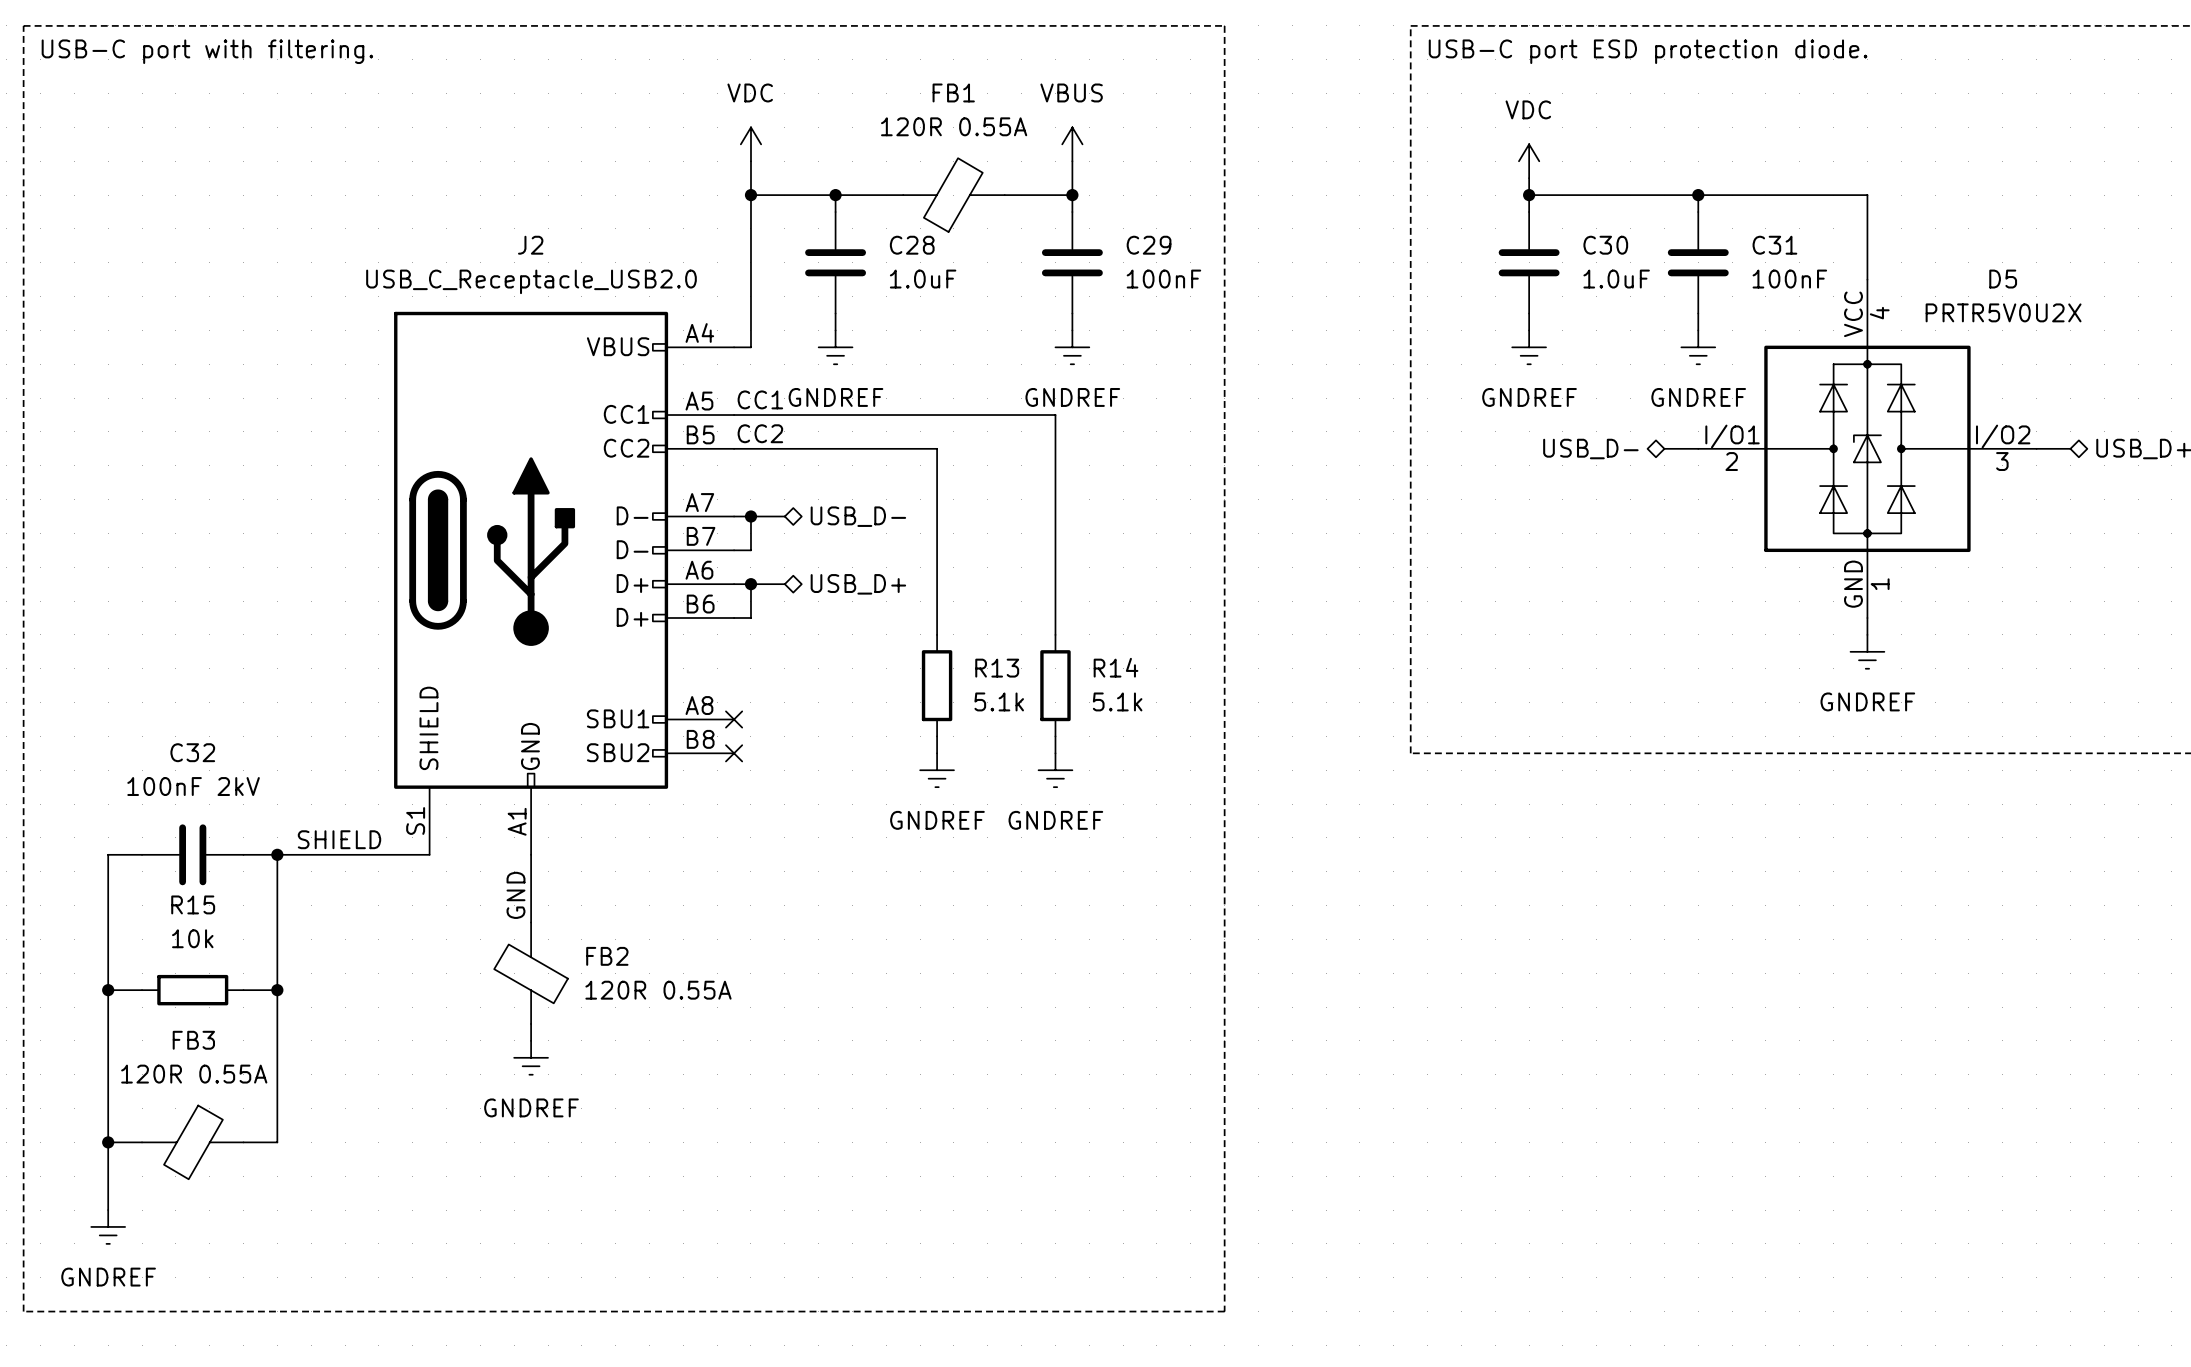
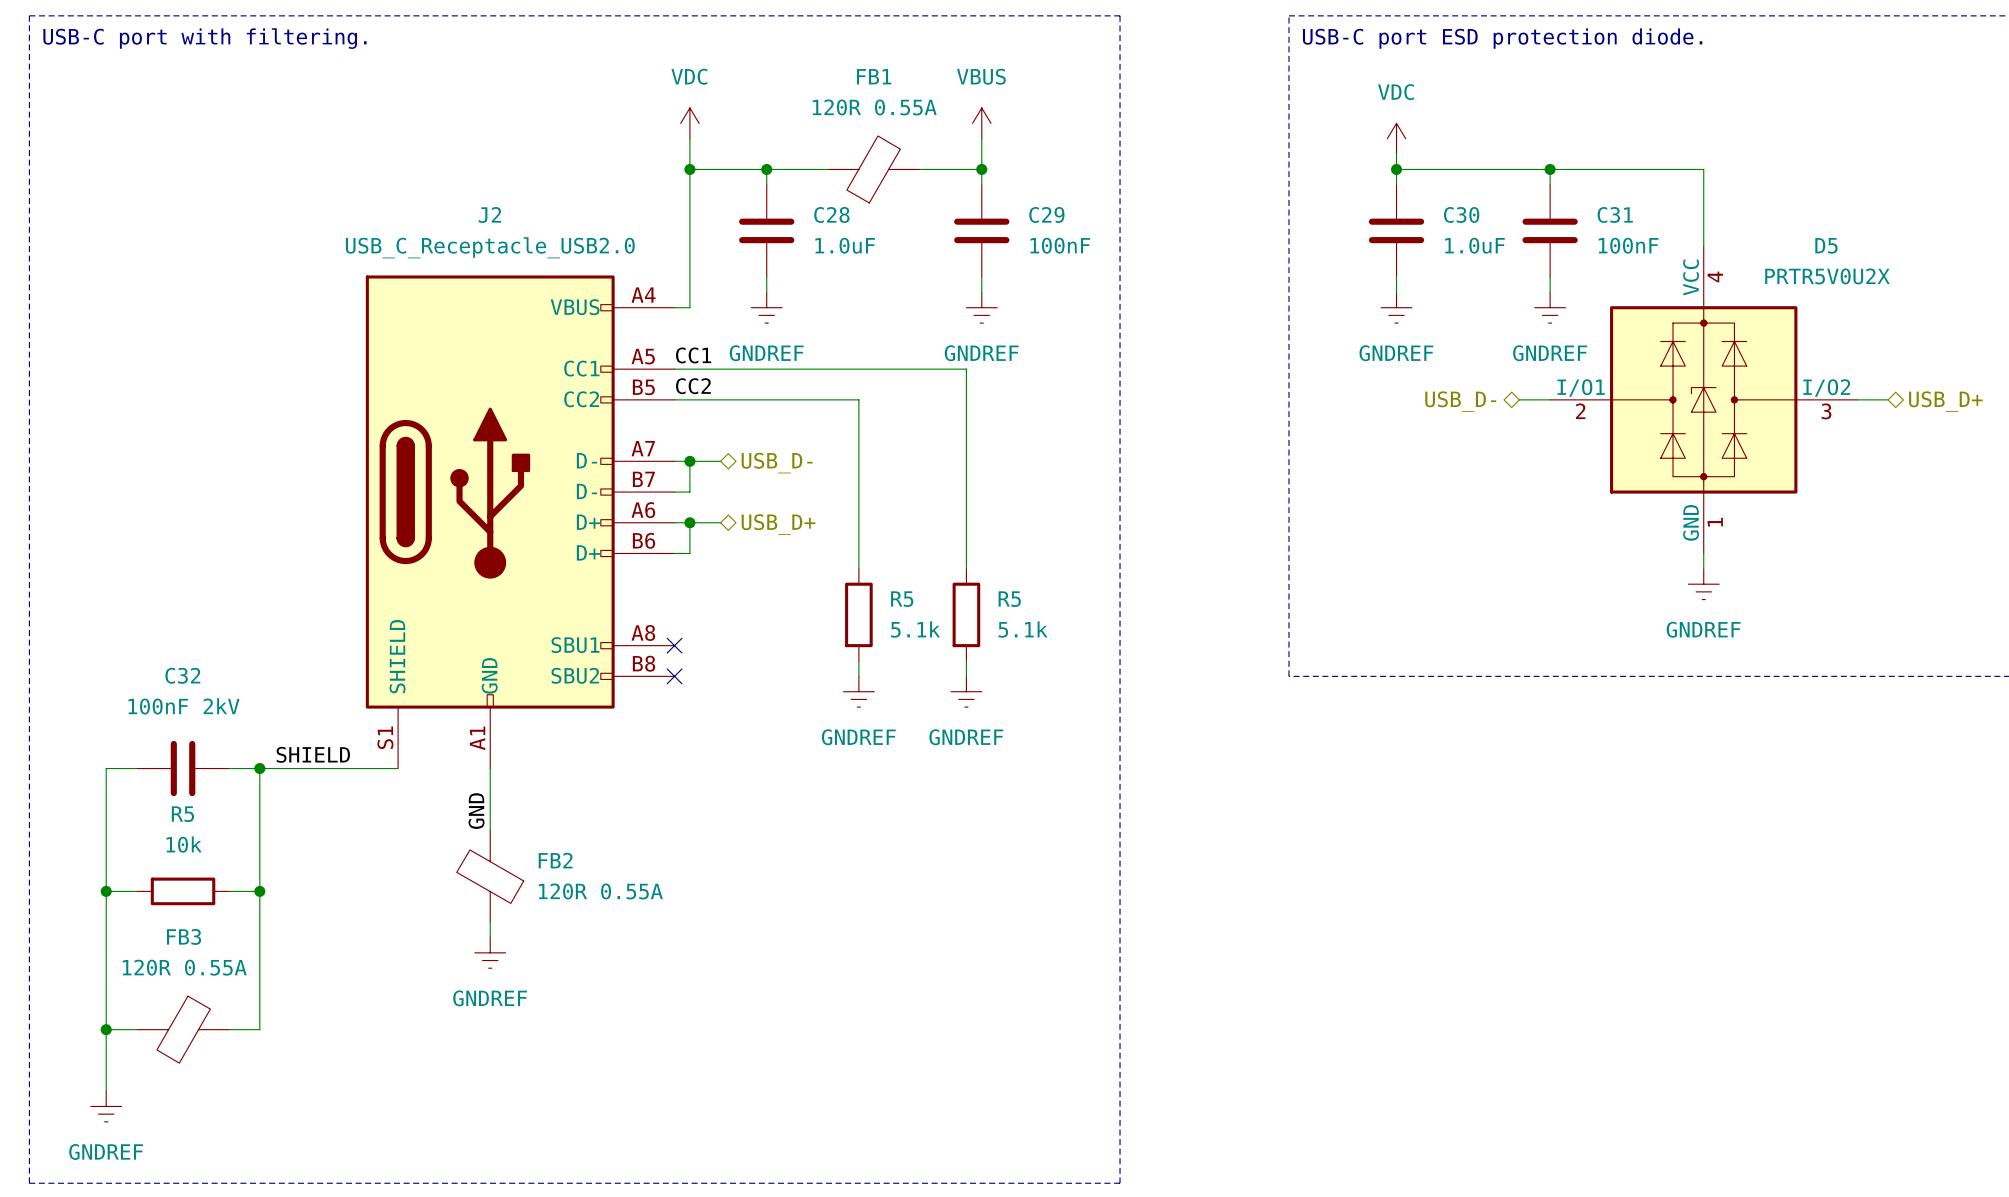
R14 name: R14 (1116, 667) -> R5 (1009, 599)
R13 name: R13 (997, 668) -> R5 (902, 599)
R15 name: R15 (193, 904) -> R5 (182, 814)

